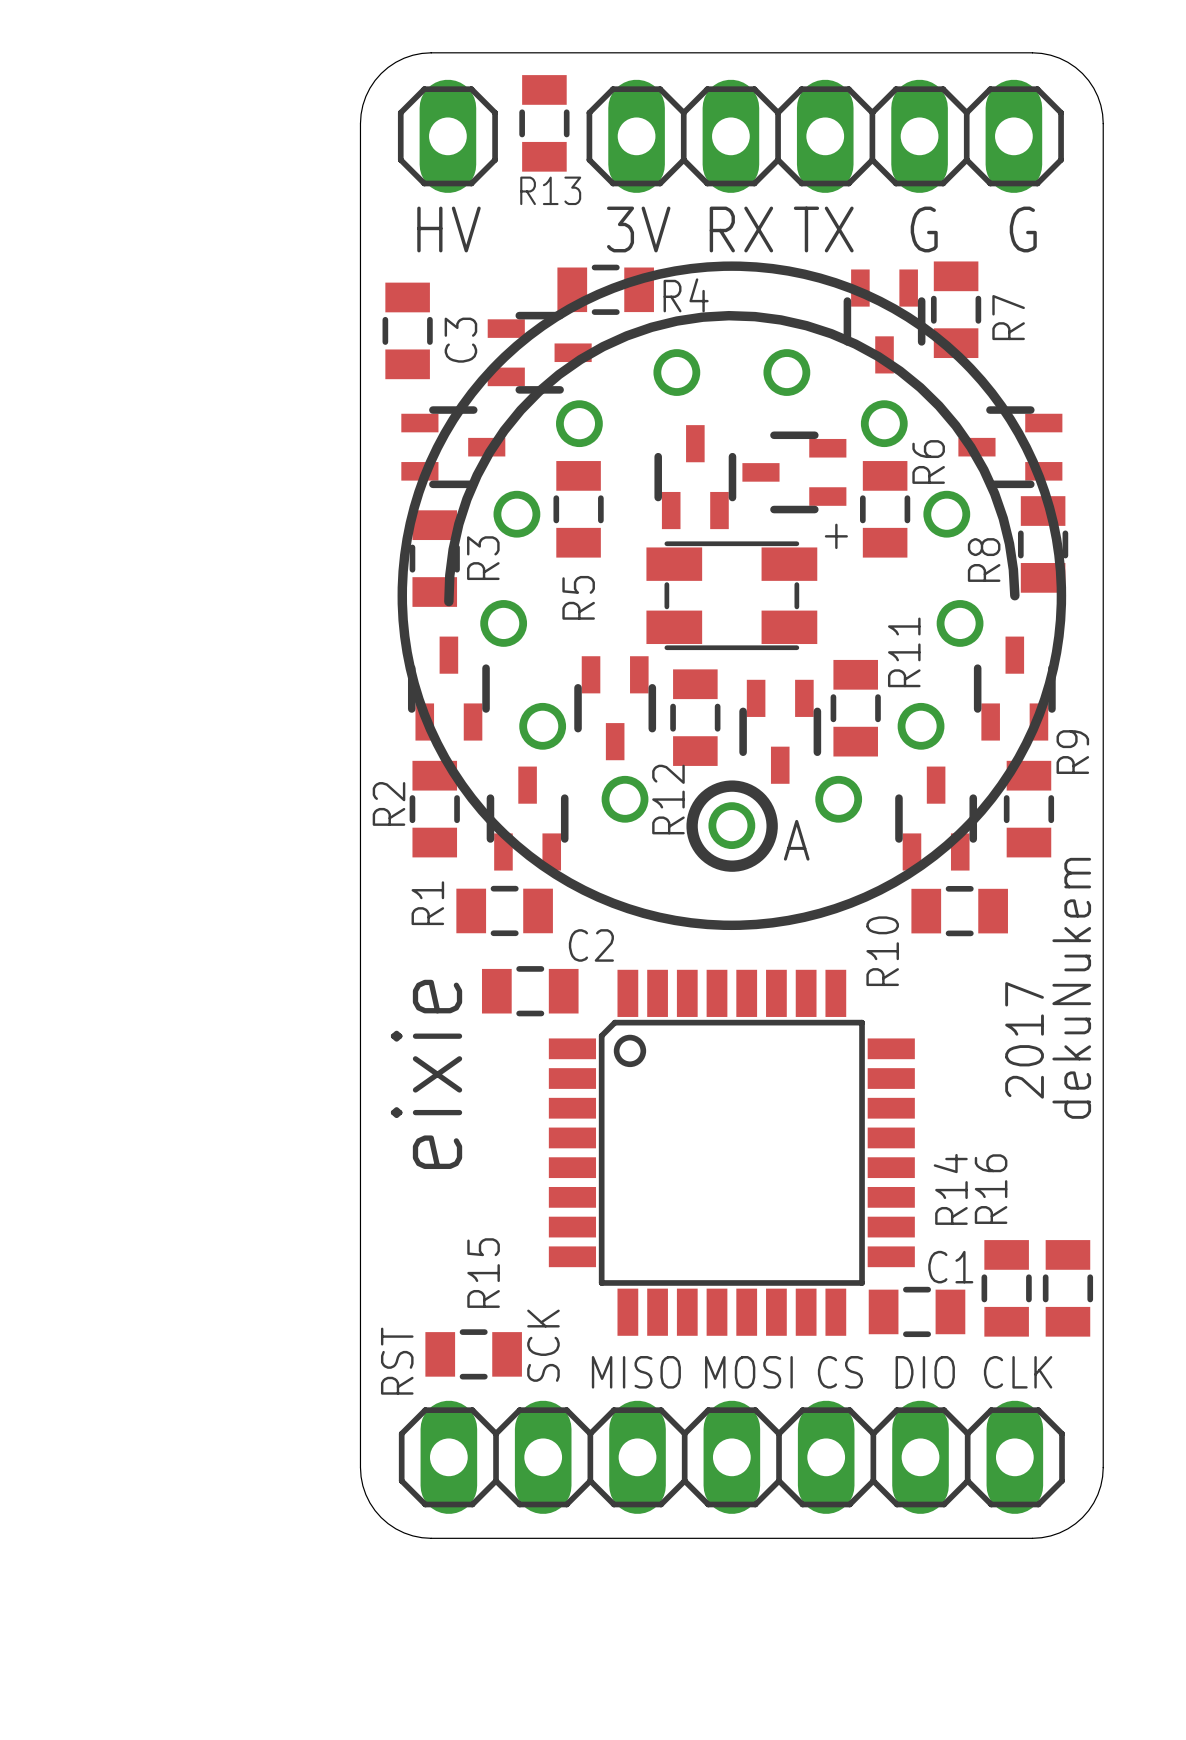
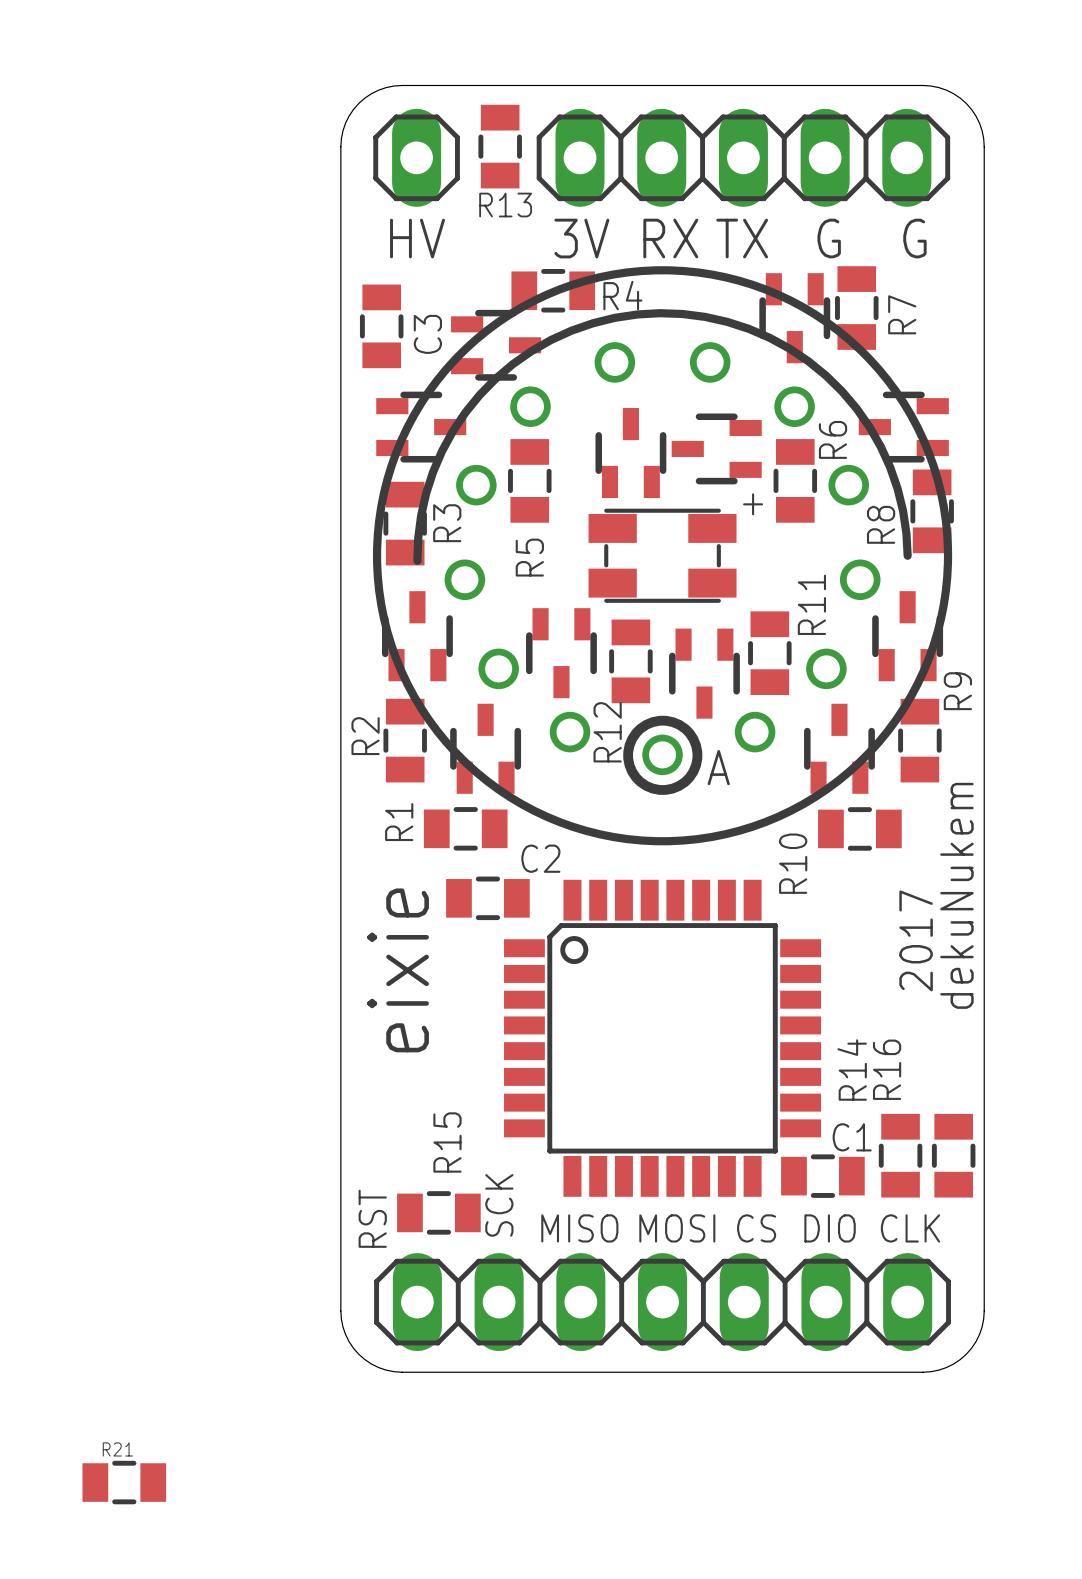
R21: none -> (124, 1482)

